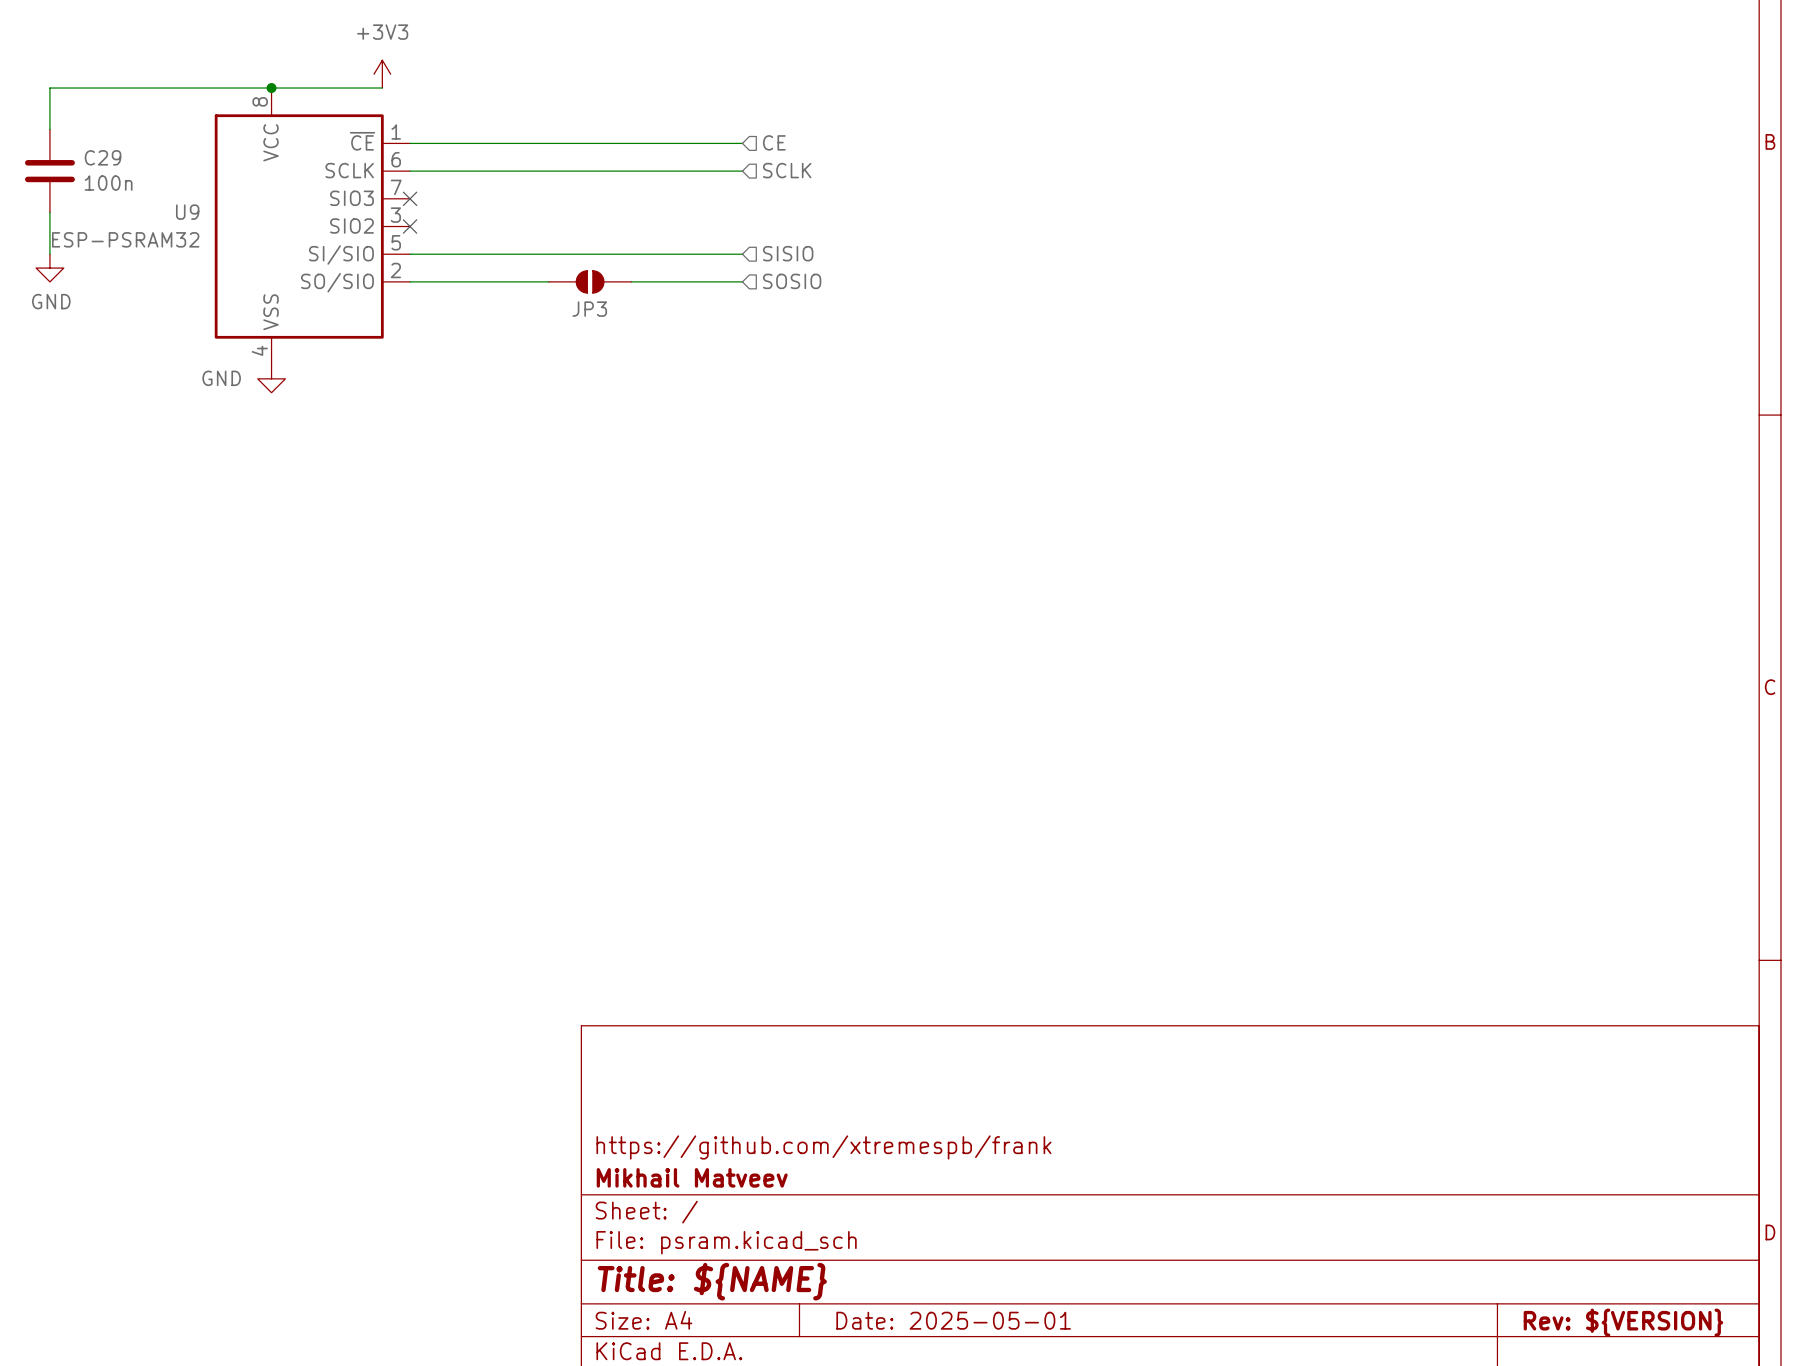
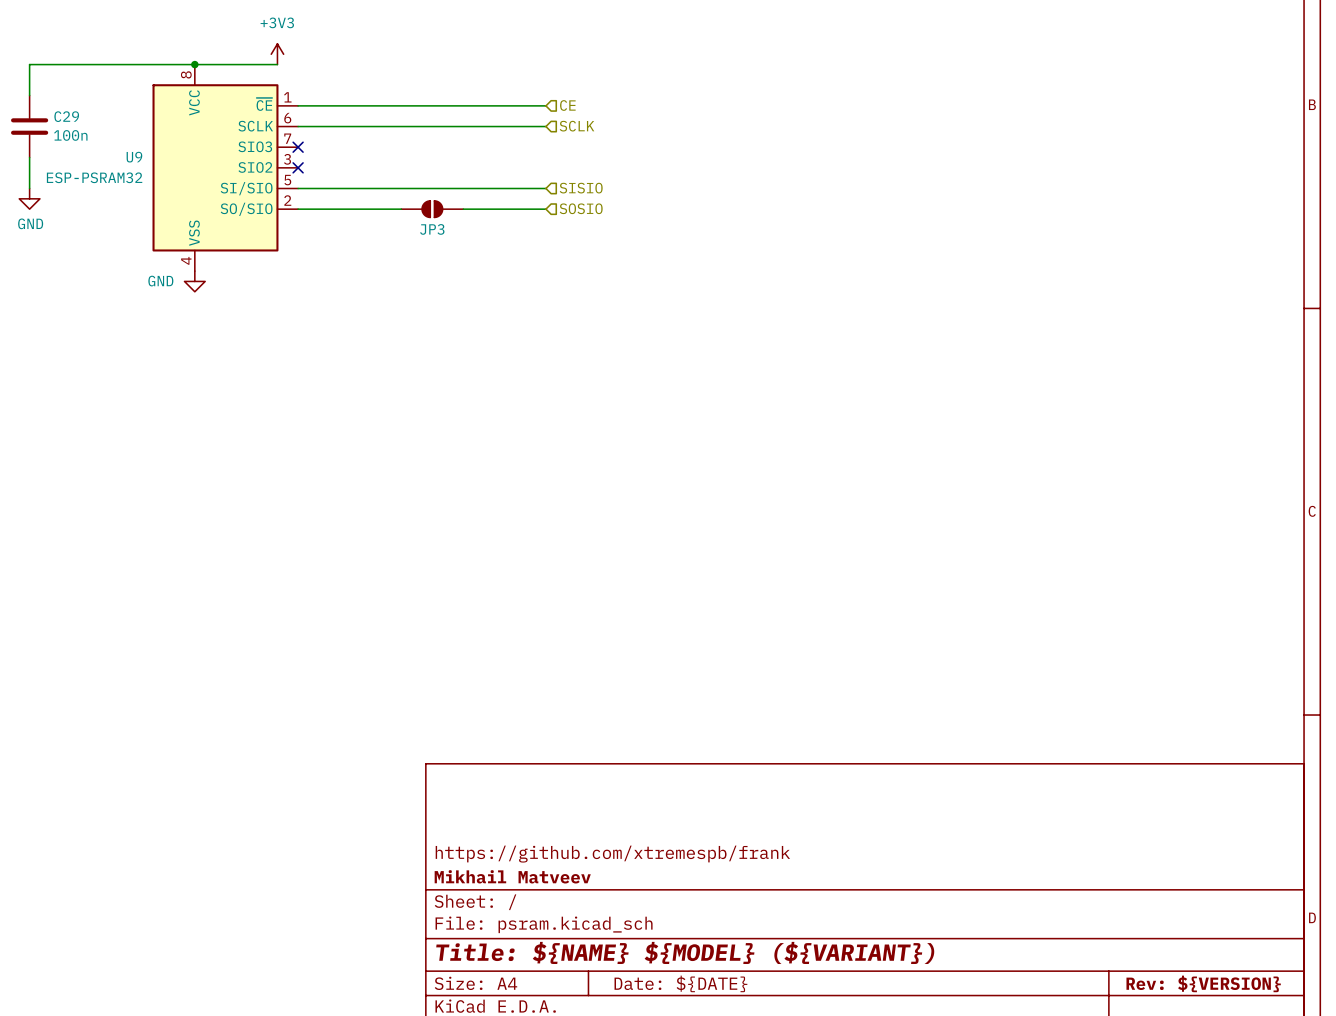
title block: Title: ${NAME} (712, 1281) -> Title: ${NAME} ${MODEL} (${VARIANT}) (685, 952)
title block: Date: 2025-05-01 (953, 1320) -> Date: ${DATE} (680, 983)

